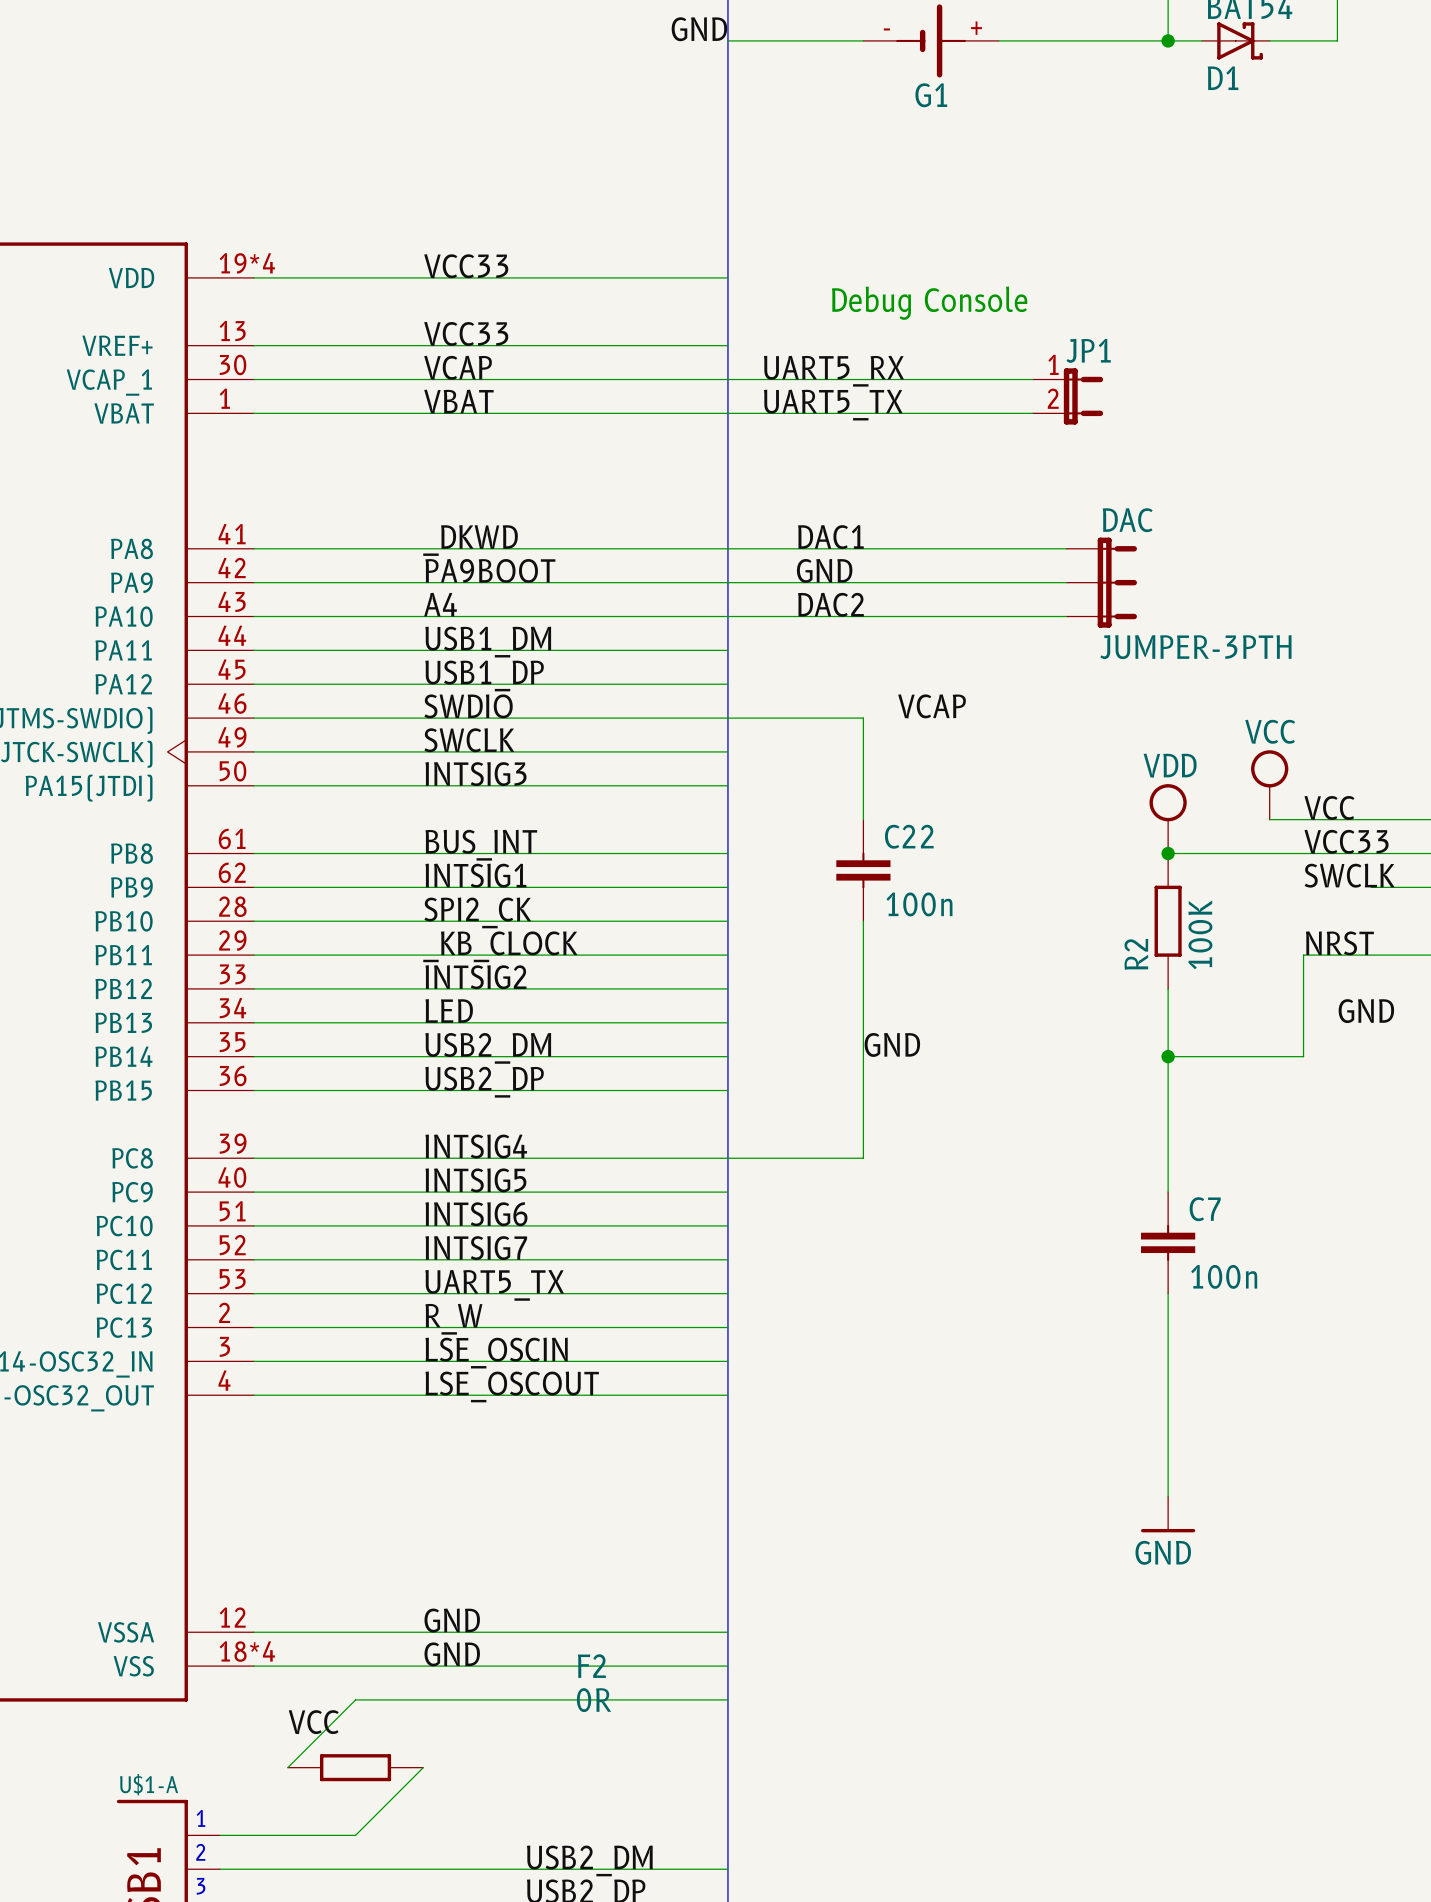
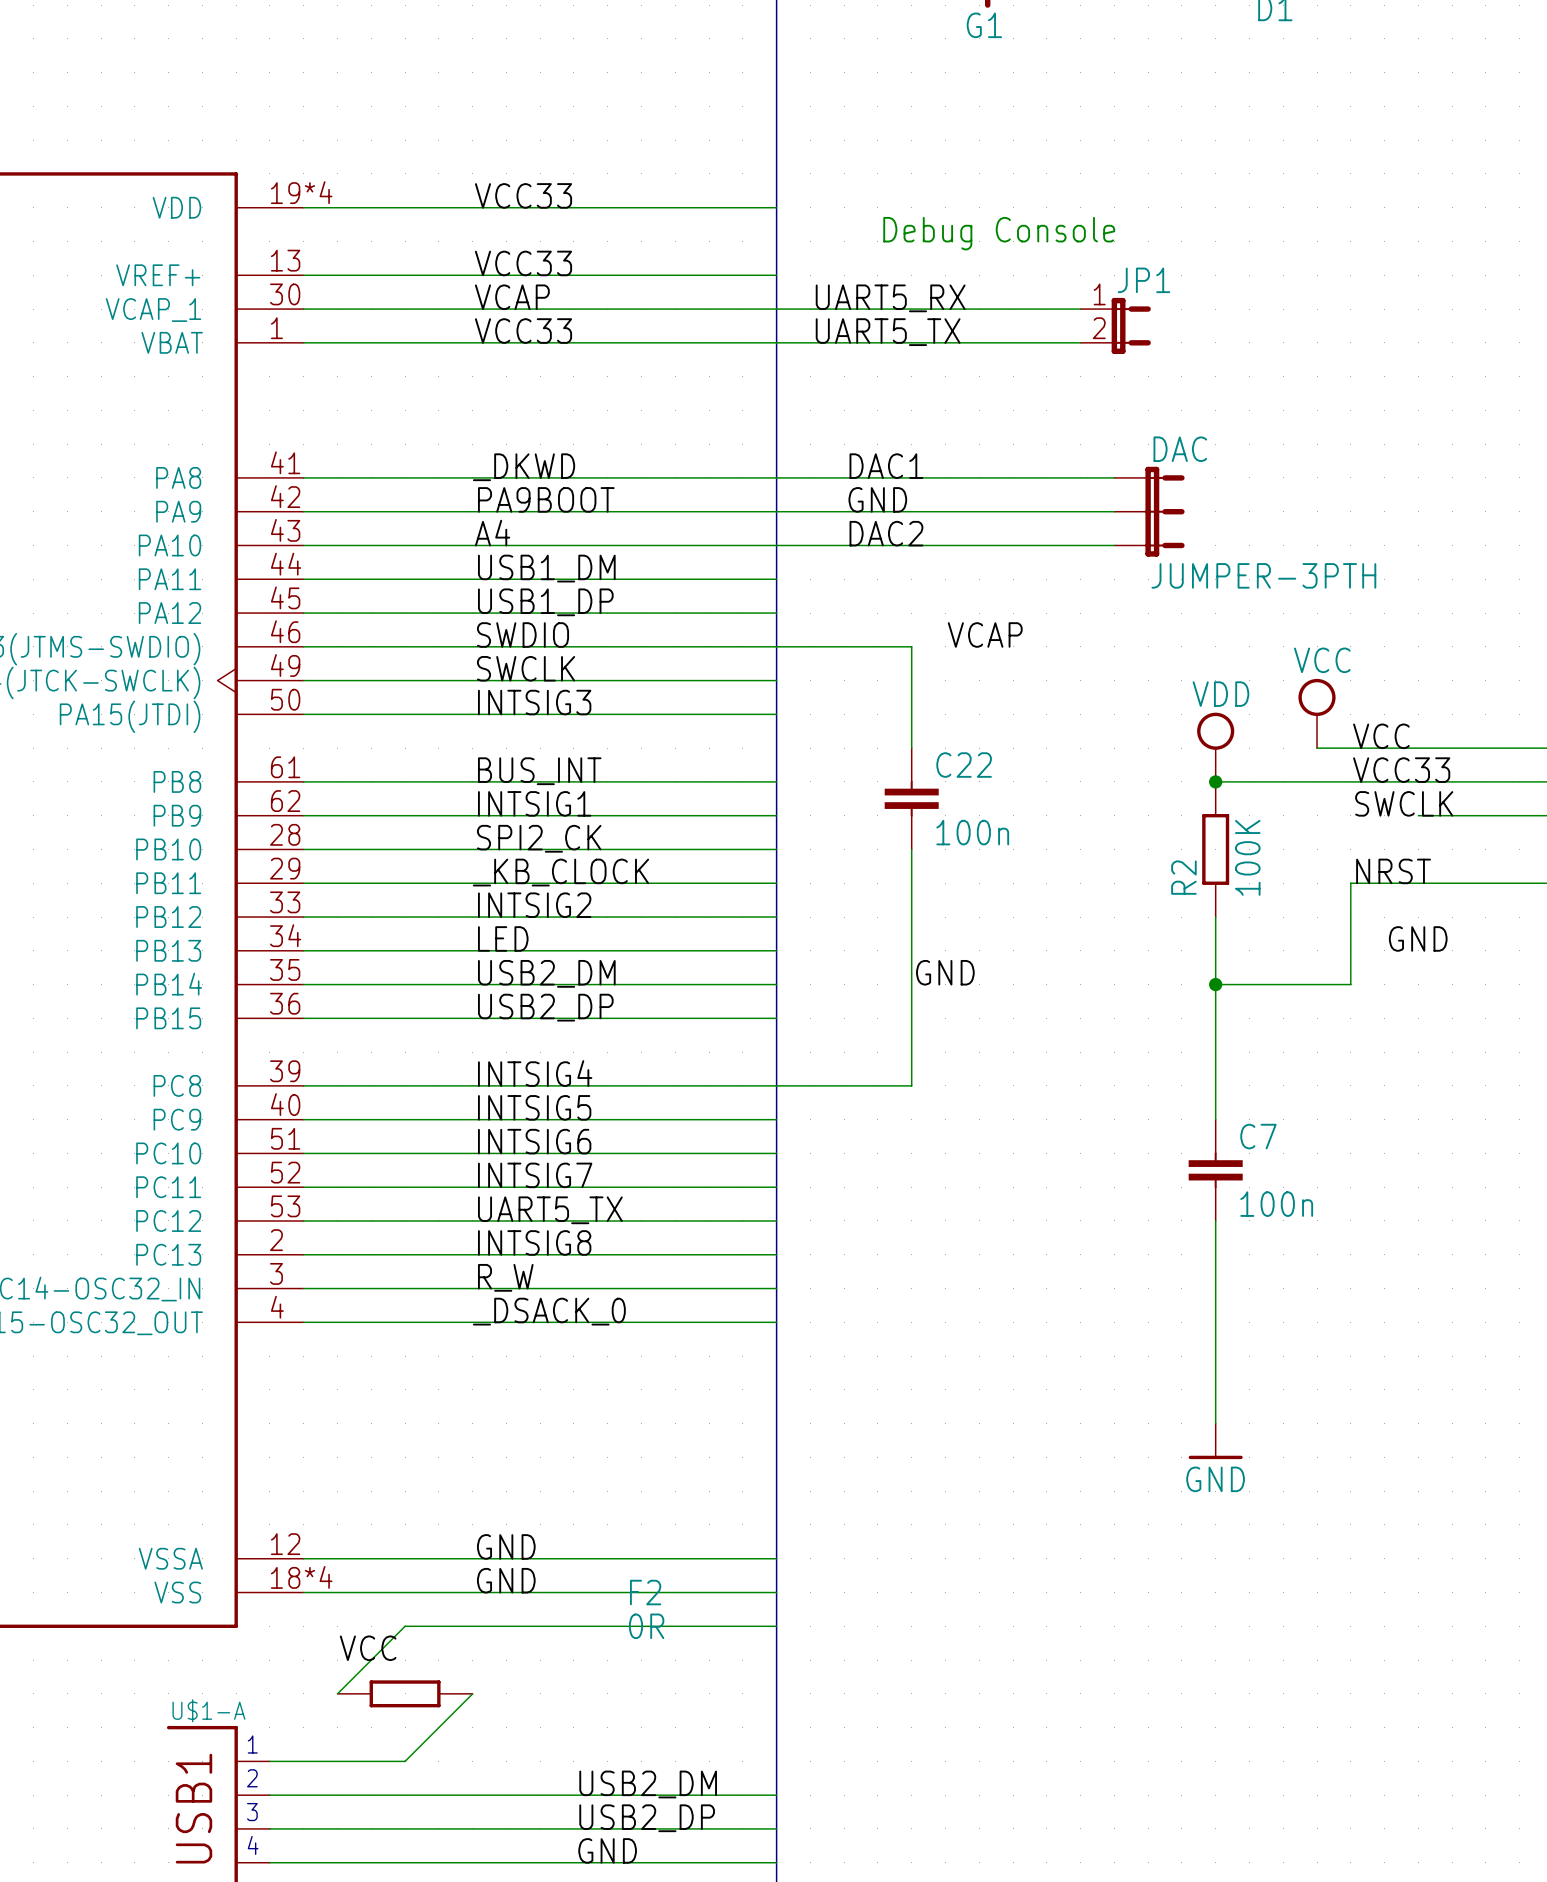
label: VBAT (458, 401) -> VCC33 (523, 331)
label: R_W (453, 1319) -> INTSIG8 (534, 1242)
label: LSE_OSCIN (496, 1353) -> R_W (505, 1277)
label: LSE_OSCOUT (512, 1386) -> _DSACK_0 (549, 1311)

